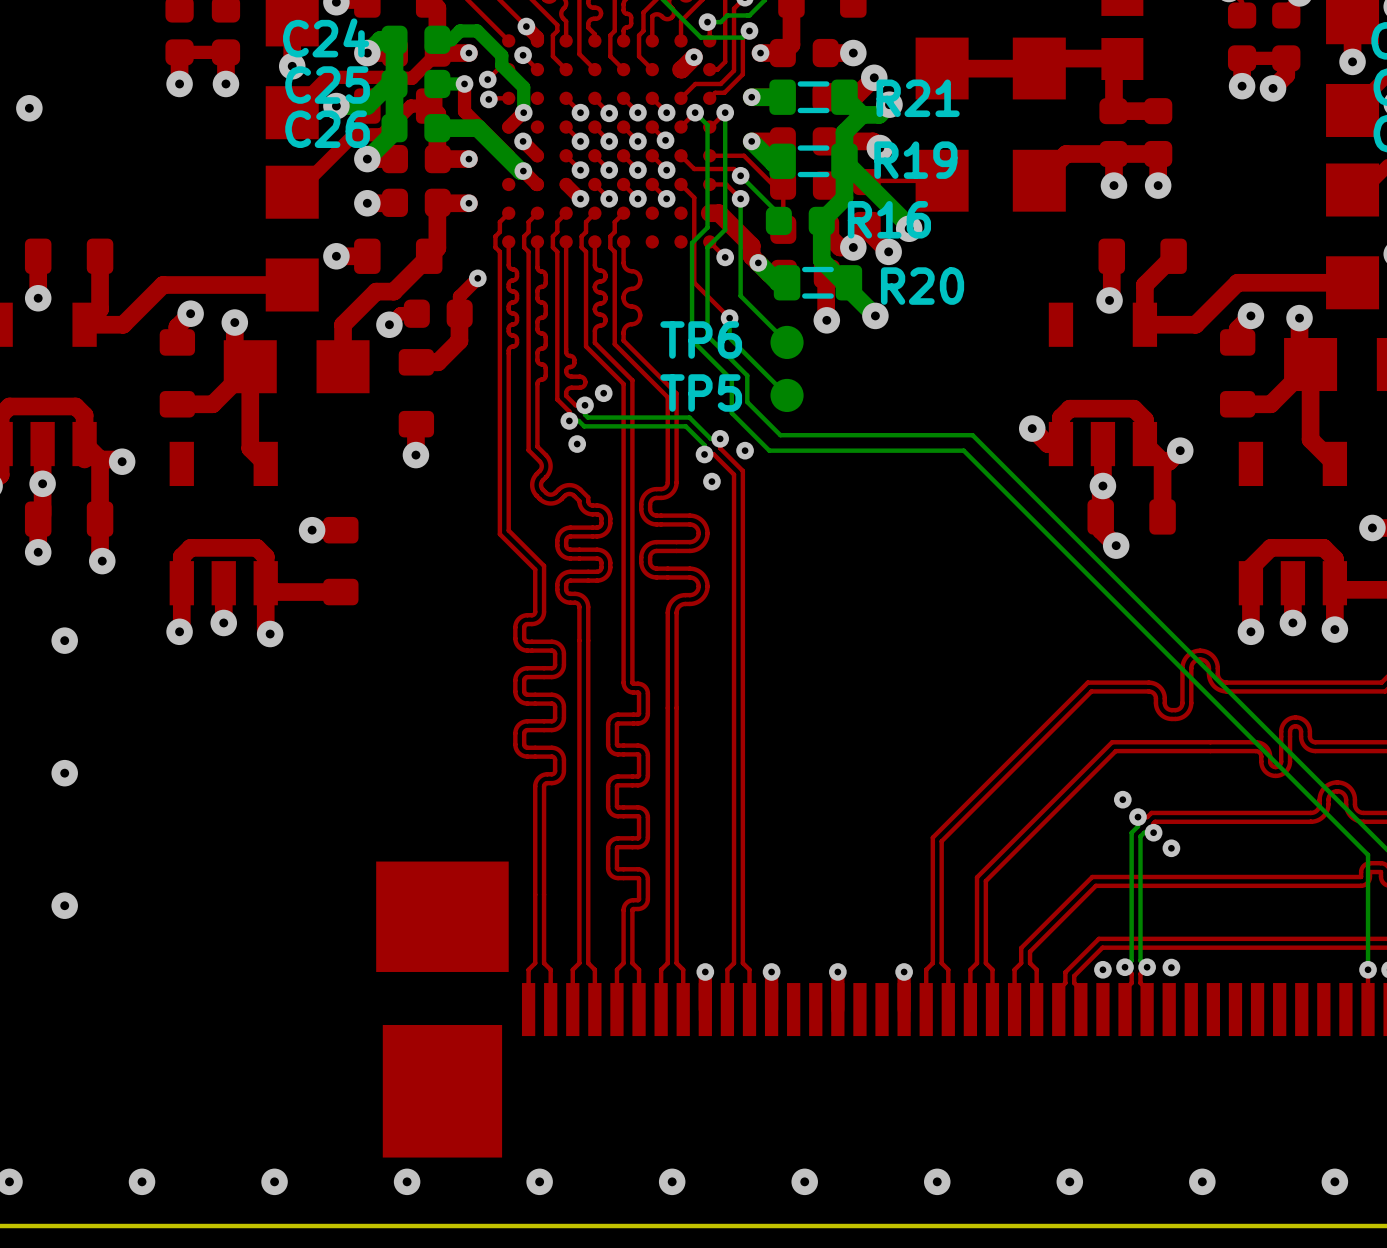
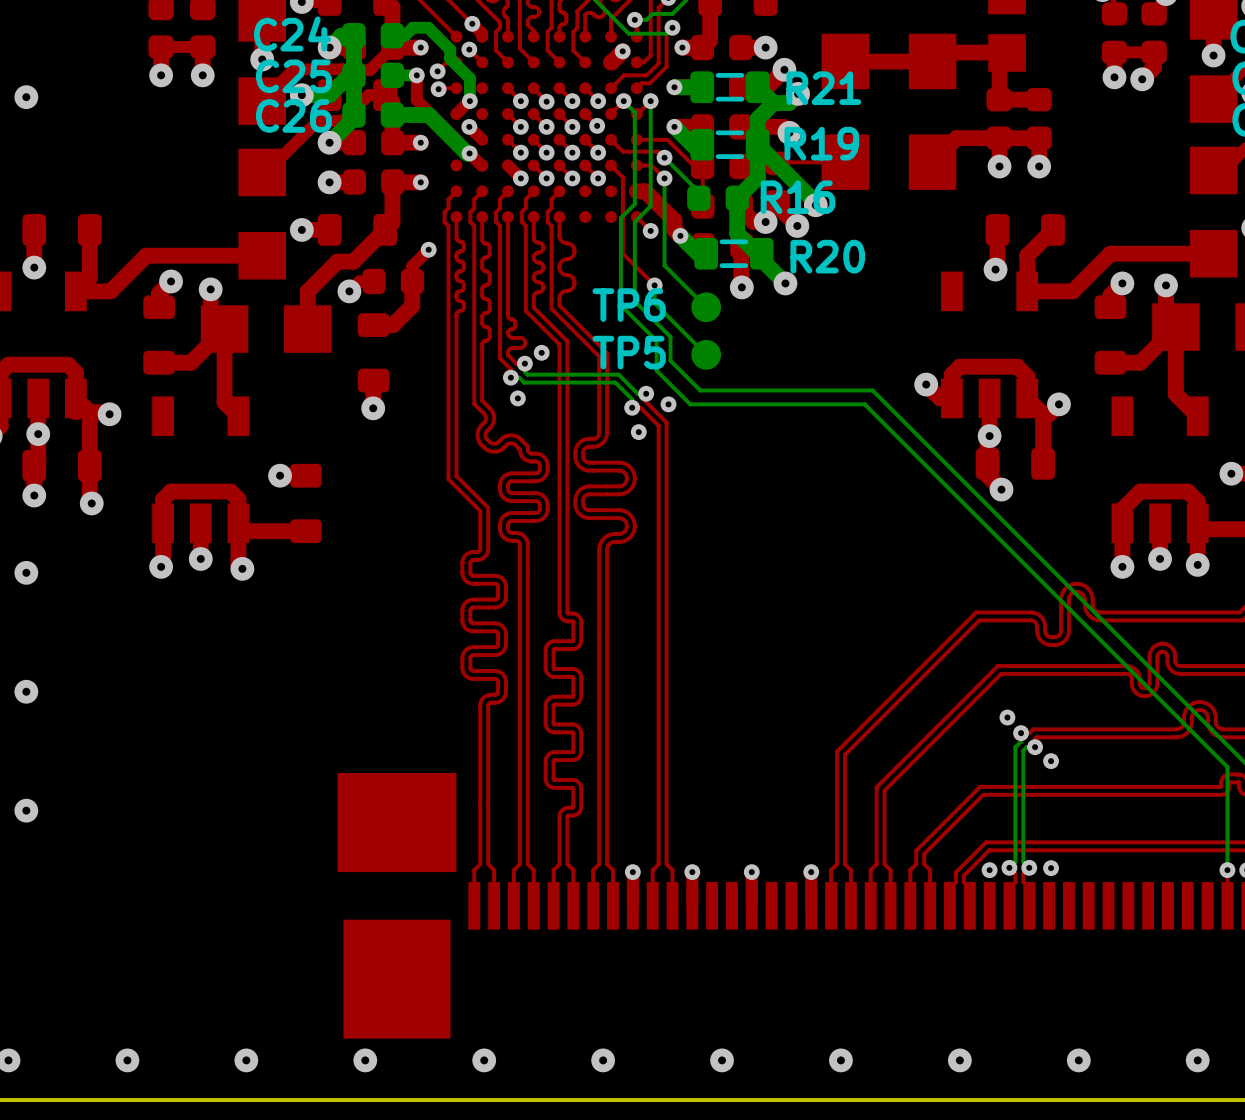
via position: (64, 640) -> (26, 572)
via position: (64, 773) -> (26, 691)
via position: (64, 905) -> (26, 810)

